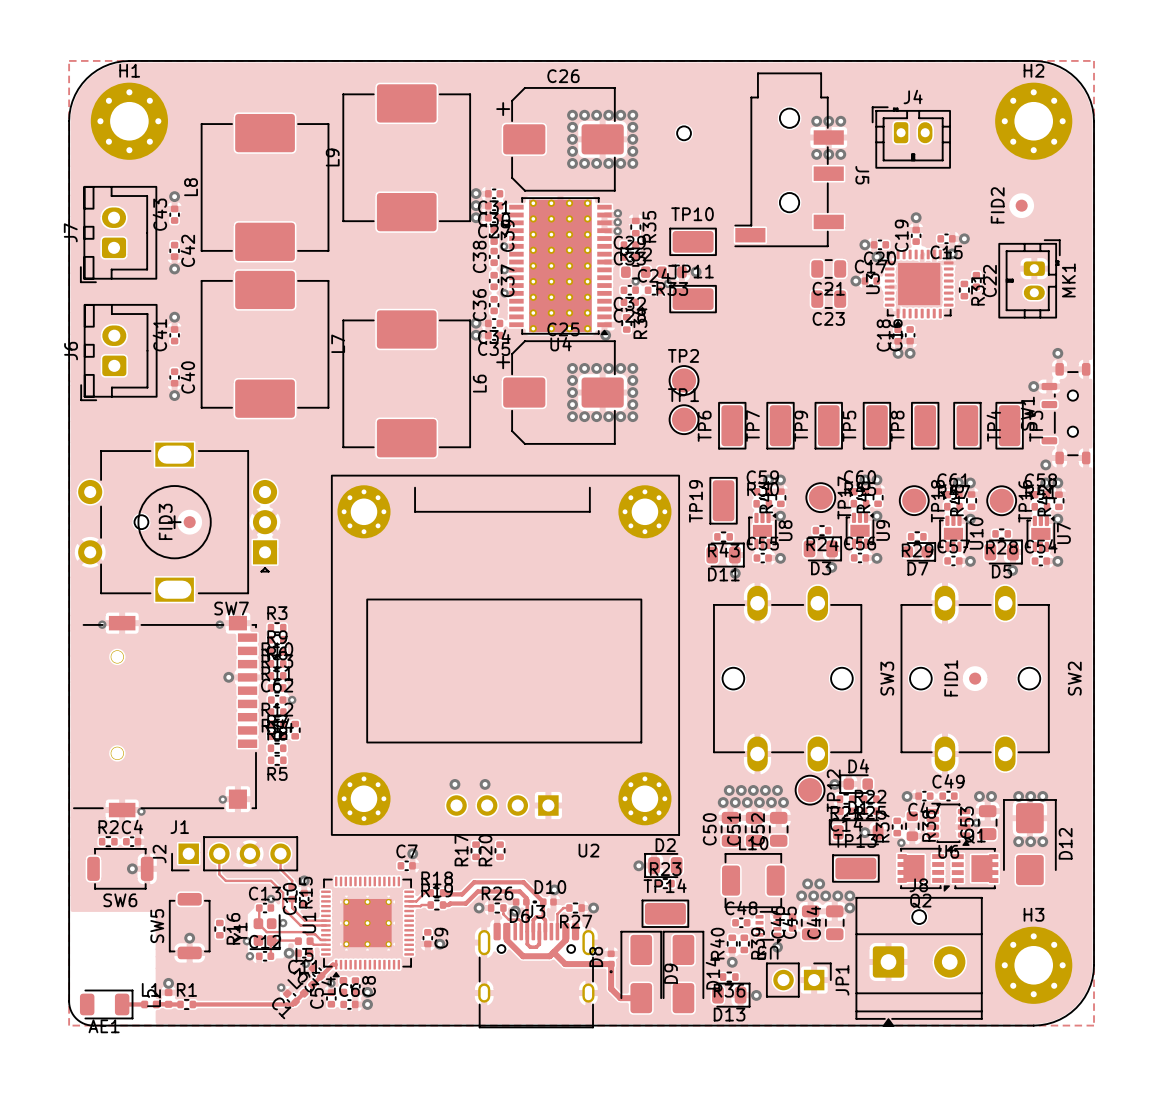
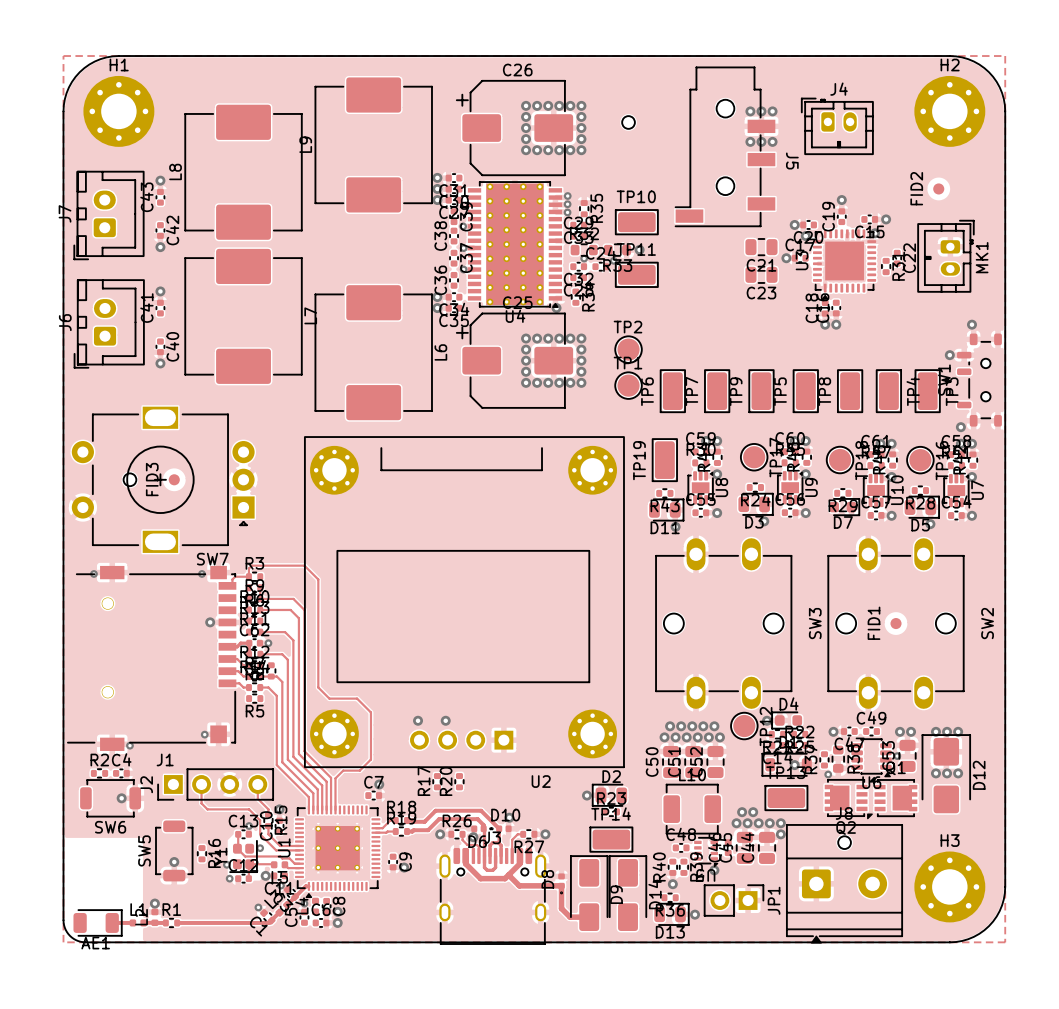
track: none -> (227, 585) (232, 585) (232, 579) (235, 576) (248, 576) (248, 568) (251, 565) (304, 565) (318, 579) (318, 687) (329, 698) (357, 698) (370, 712) (370, 759) (359, 770) (343, 770) (335, 778) (335, 809)
track: none -> (260, 587) (260, 598) (293, 598) (304, 609) (304, 751) (331, 777) (331, 809)
track: none -> (248, 621) (260, 609) (290, 609) (298, 618) (298, 754) (326, 781) (326, 809)
track: none -> (260, 632) (285, 632) (293, 640) (293, 756) (322, 785) (322, 809)
track: none -> (227, 646) (237, 646) (240, 643) (249, 643) (249, 654)
track: none -> (260, 654) (282, 654) (287, 659) (287, 759) (317, 789) (317, 809)
track: none -> (227, 659) (237, 659) (243, 665) (248, 665)
track: none -> (227, 671) (238, 671) (243, 676) (248, 676)
track: none -> (260, 676) (276, 676) (282, 681) (282, 762) (313, 793) (313, 809)
track: none -> (227, 683) (239, 683) (243, 687) (248, 687)
track: none -> (260, 687) (268, 687) (276, 695) (276, 765) (308, 797) (308, 809)

